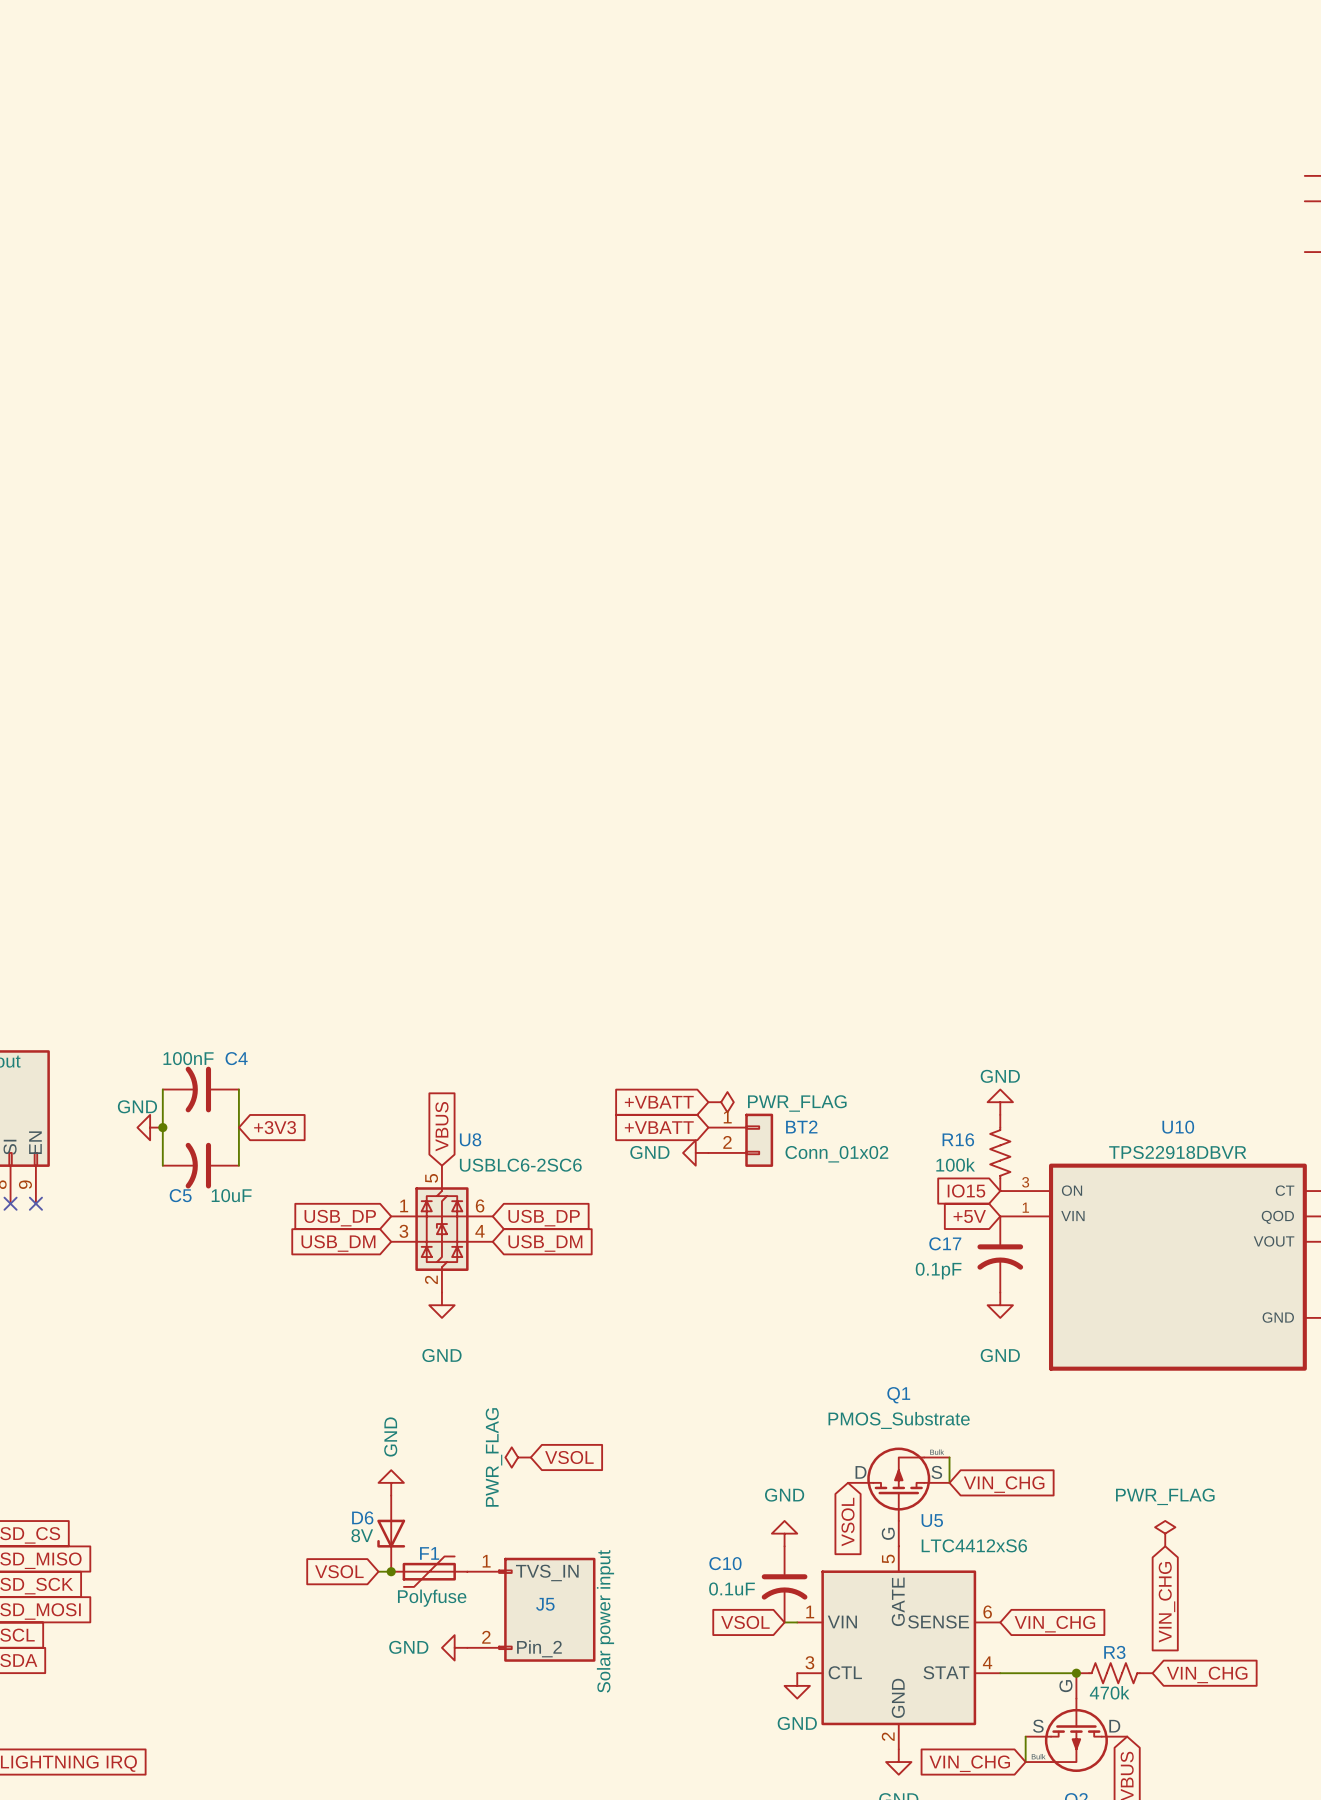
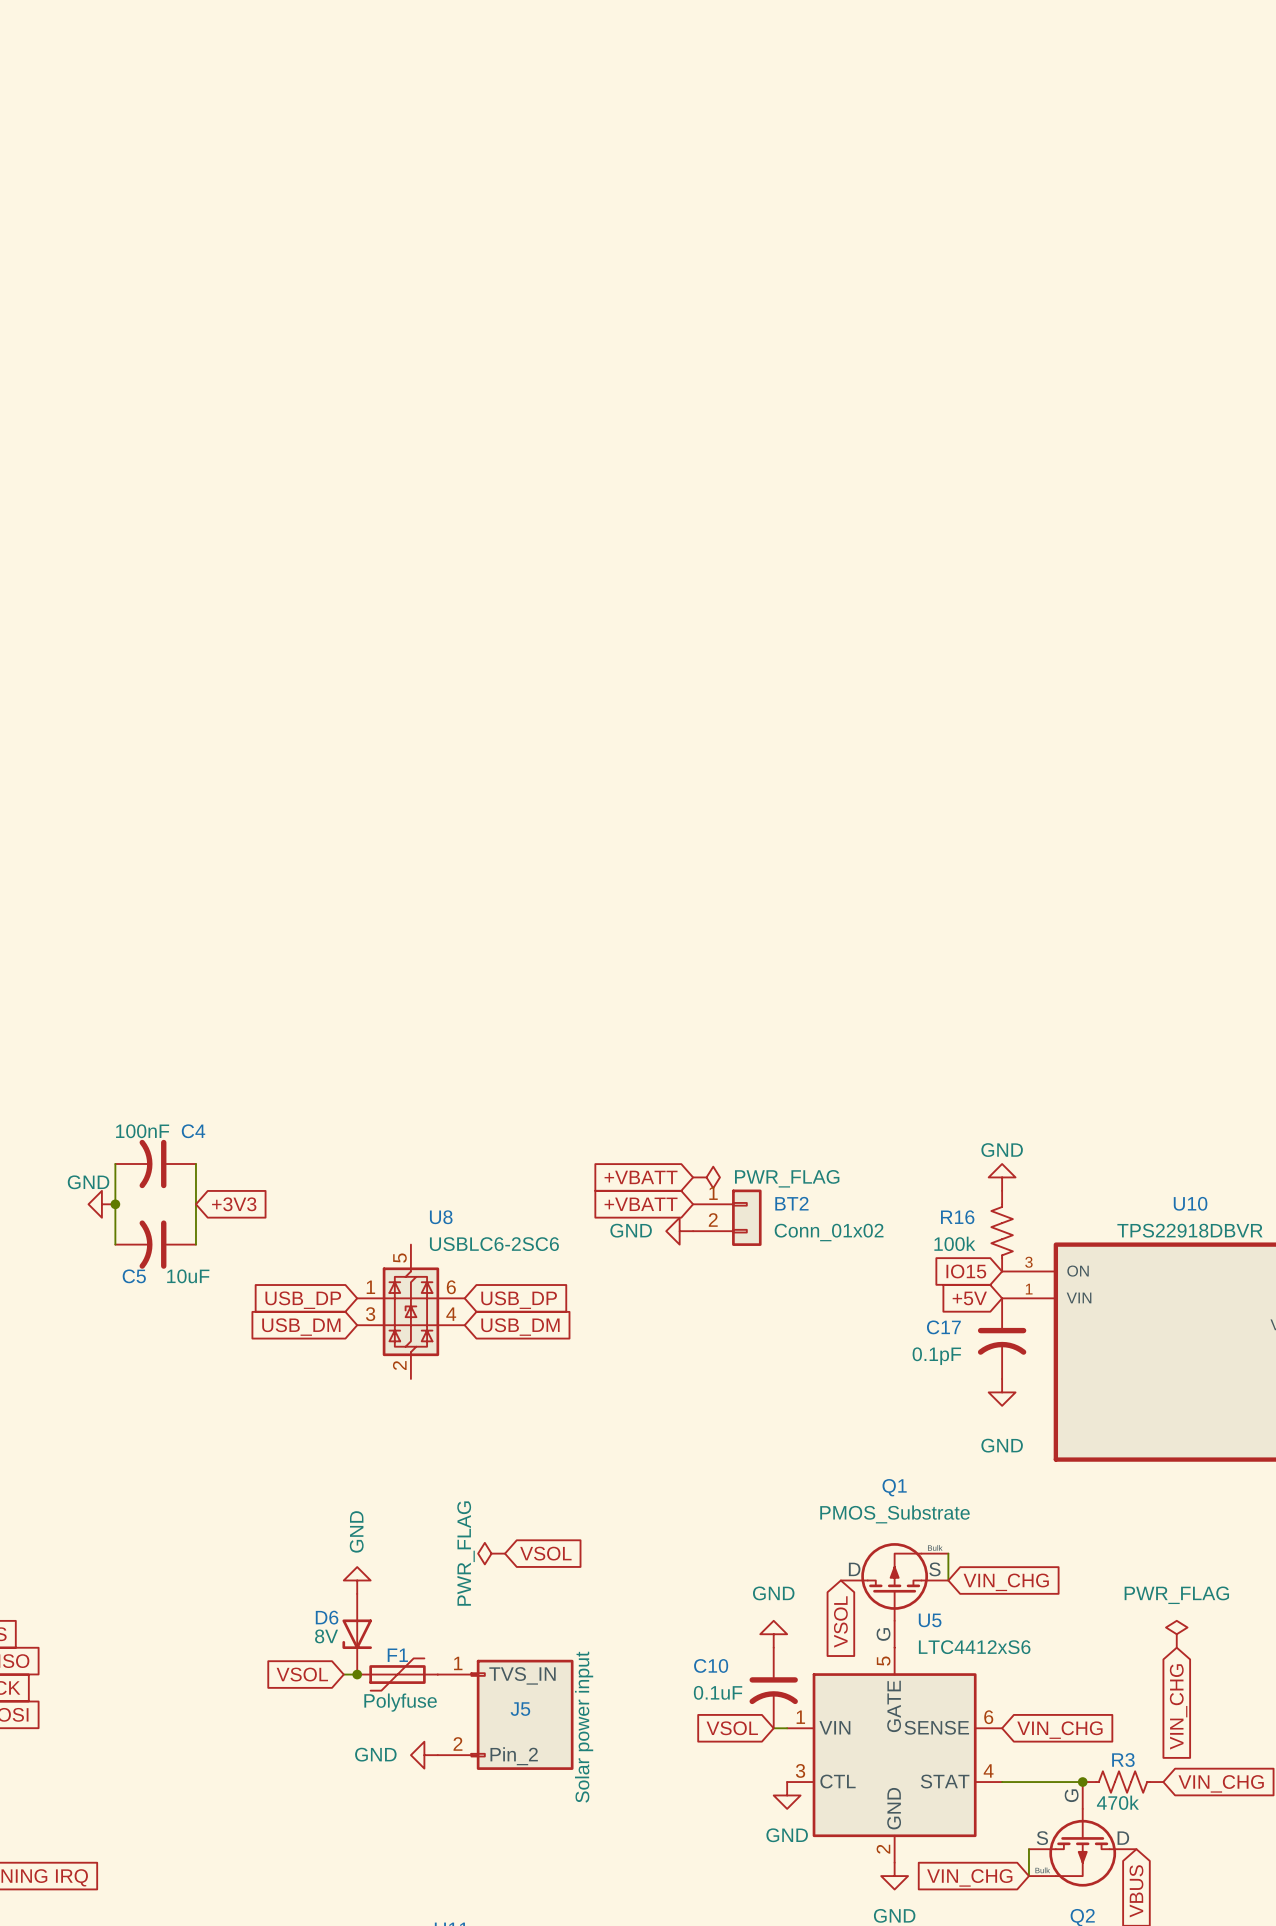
global label: VBUS (441, 1126) -> none
power symbol: GND (441, 1305) -> none

